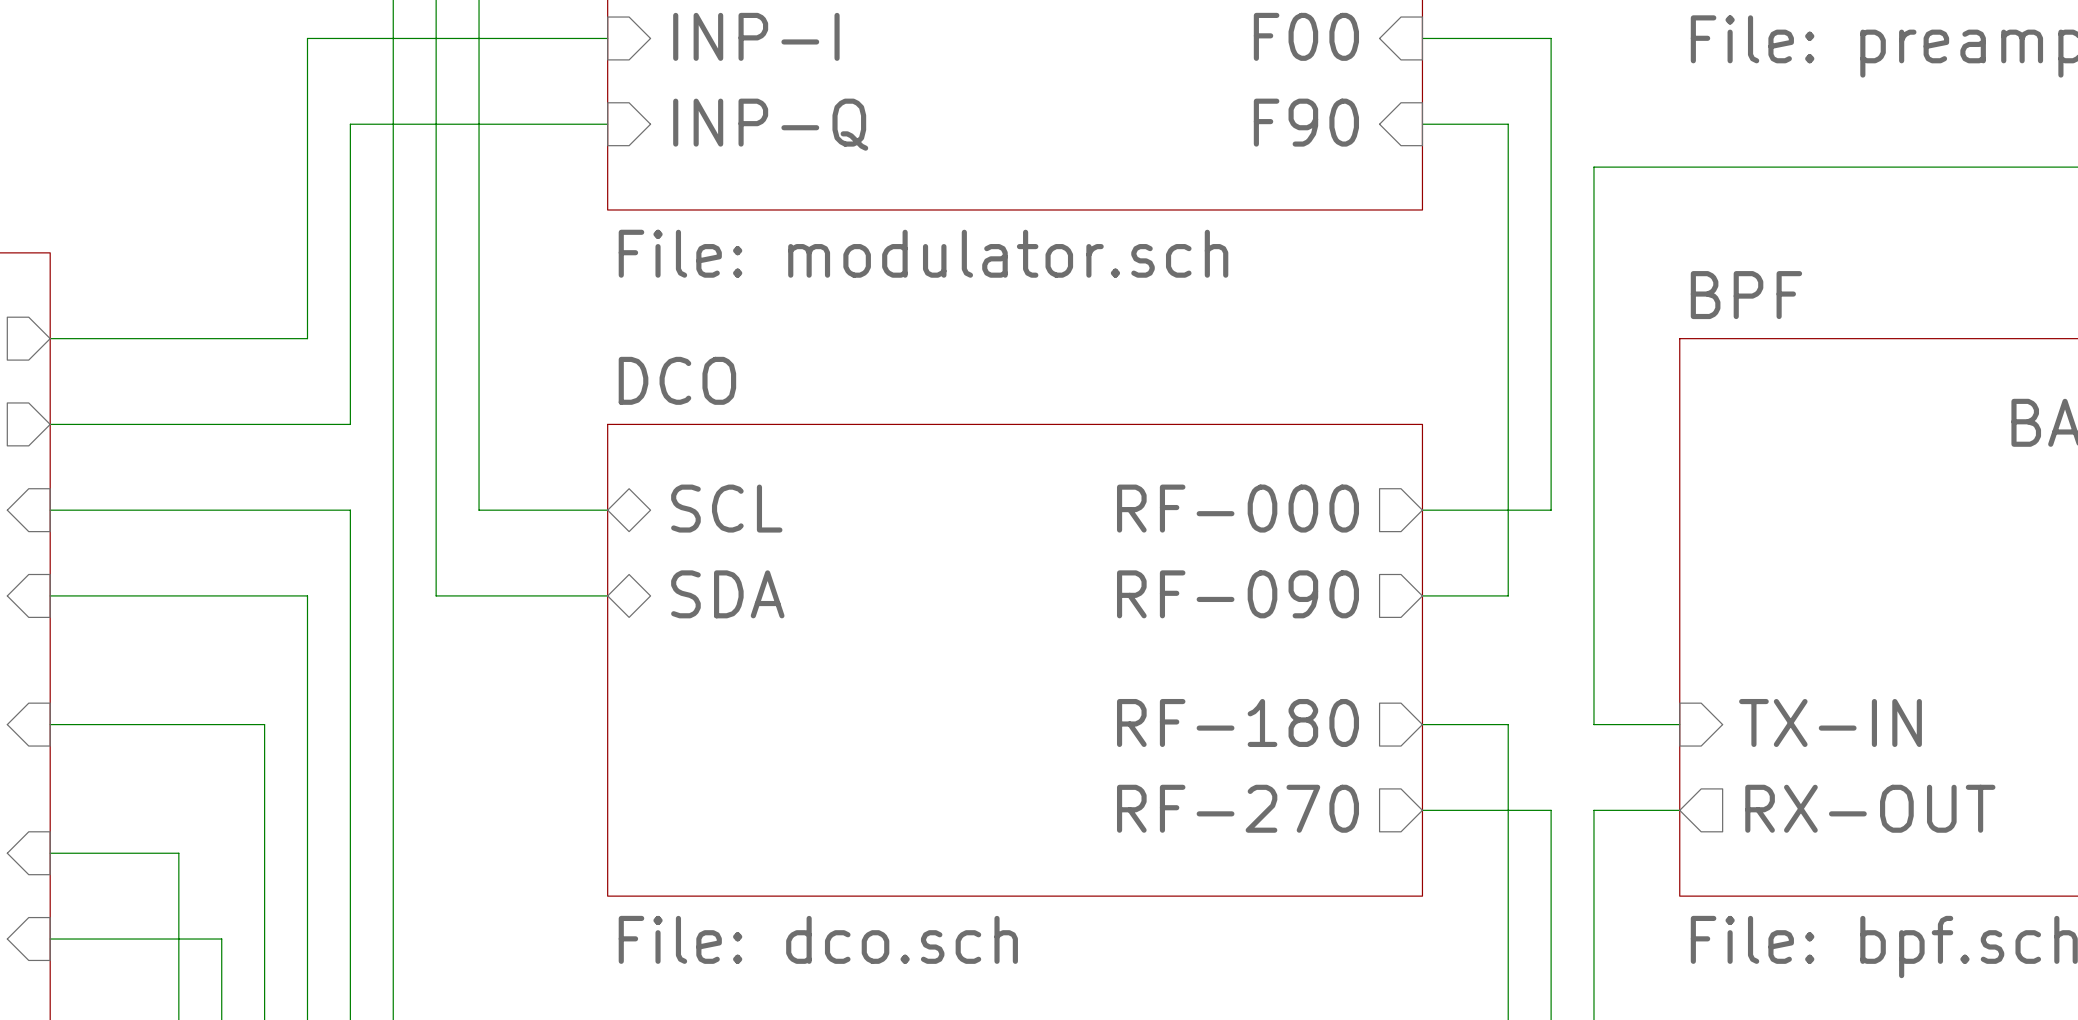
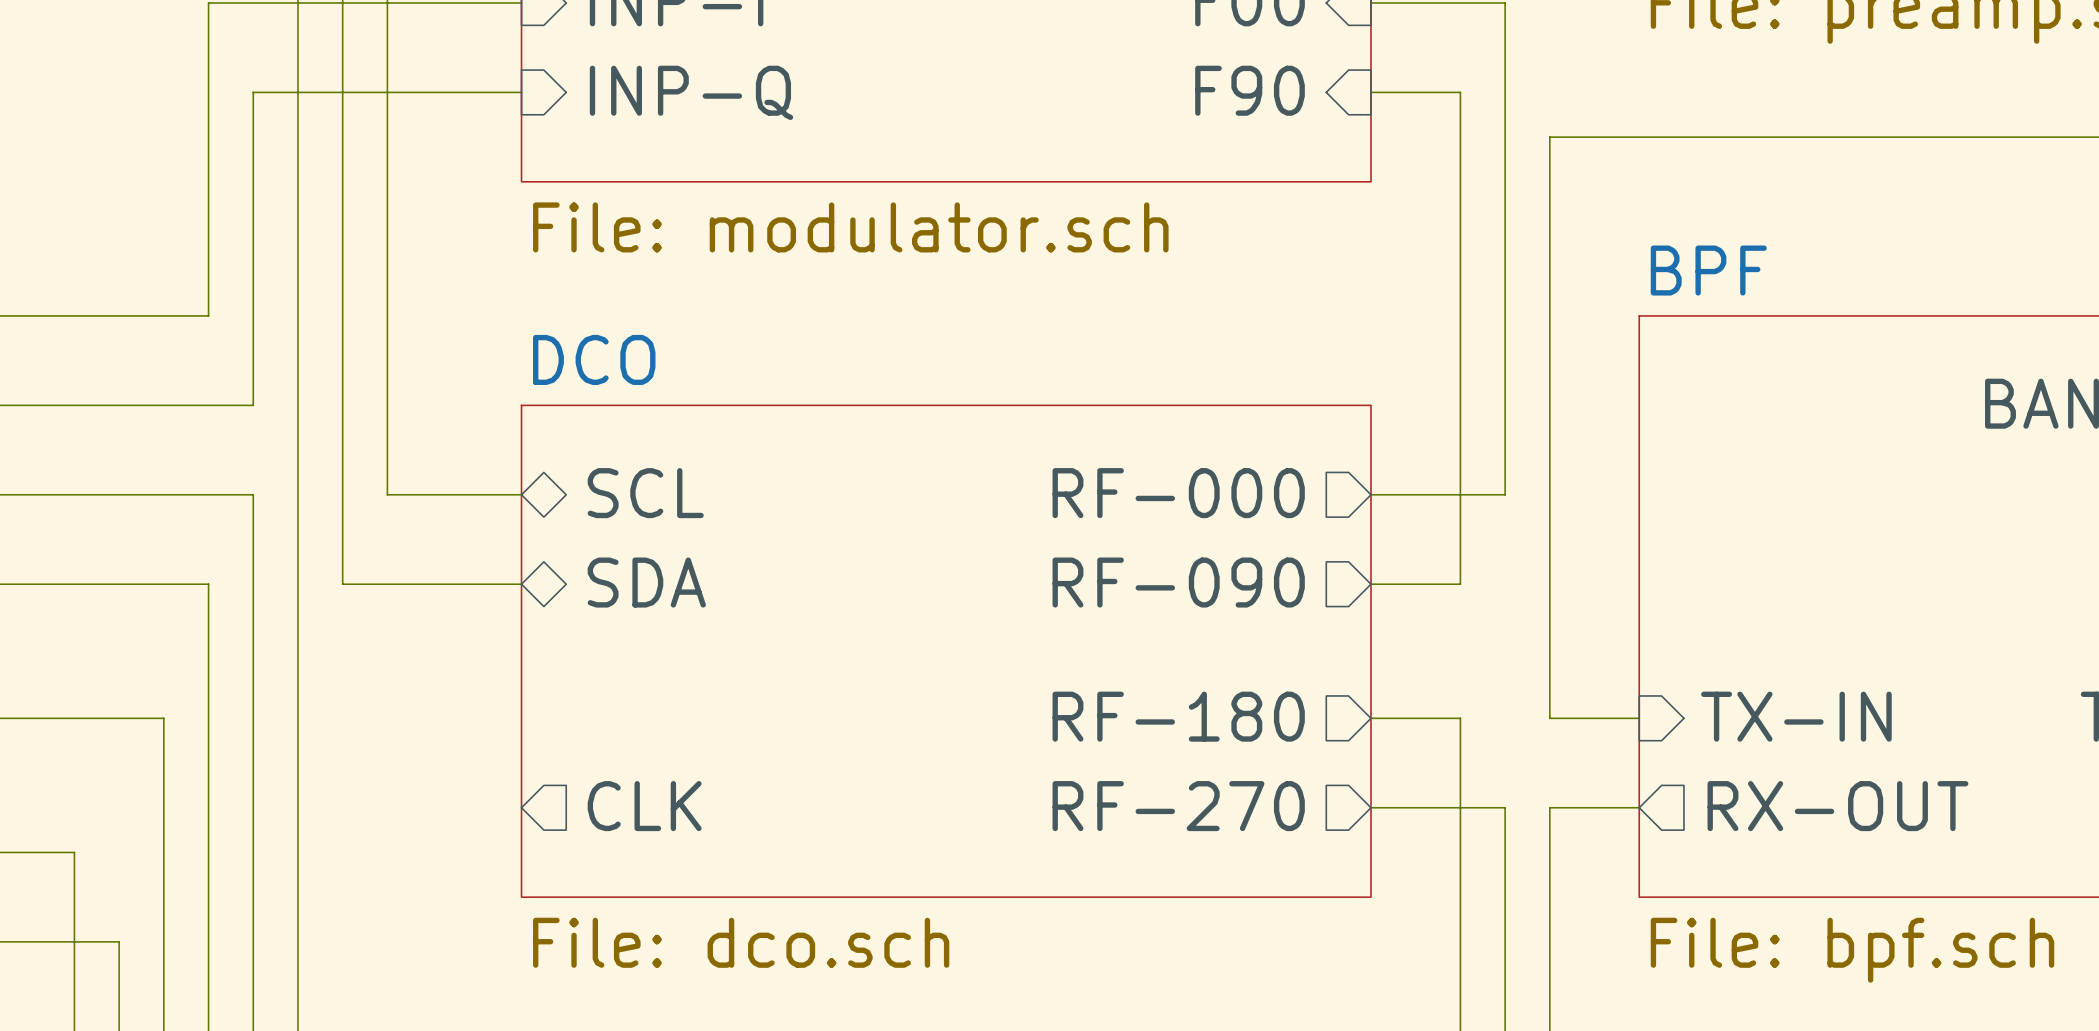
sheet pin: none -> CLK (644, 806)

